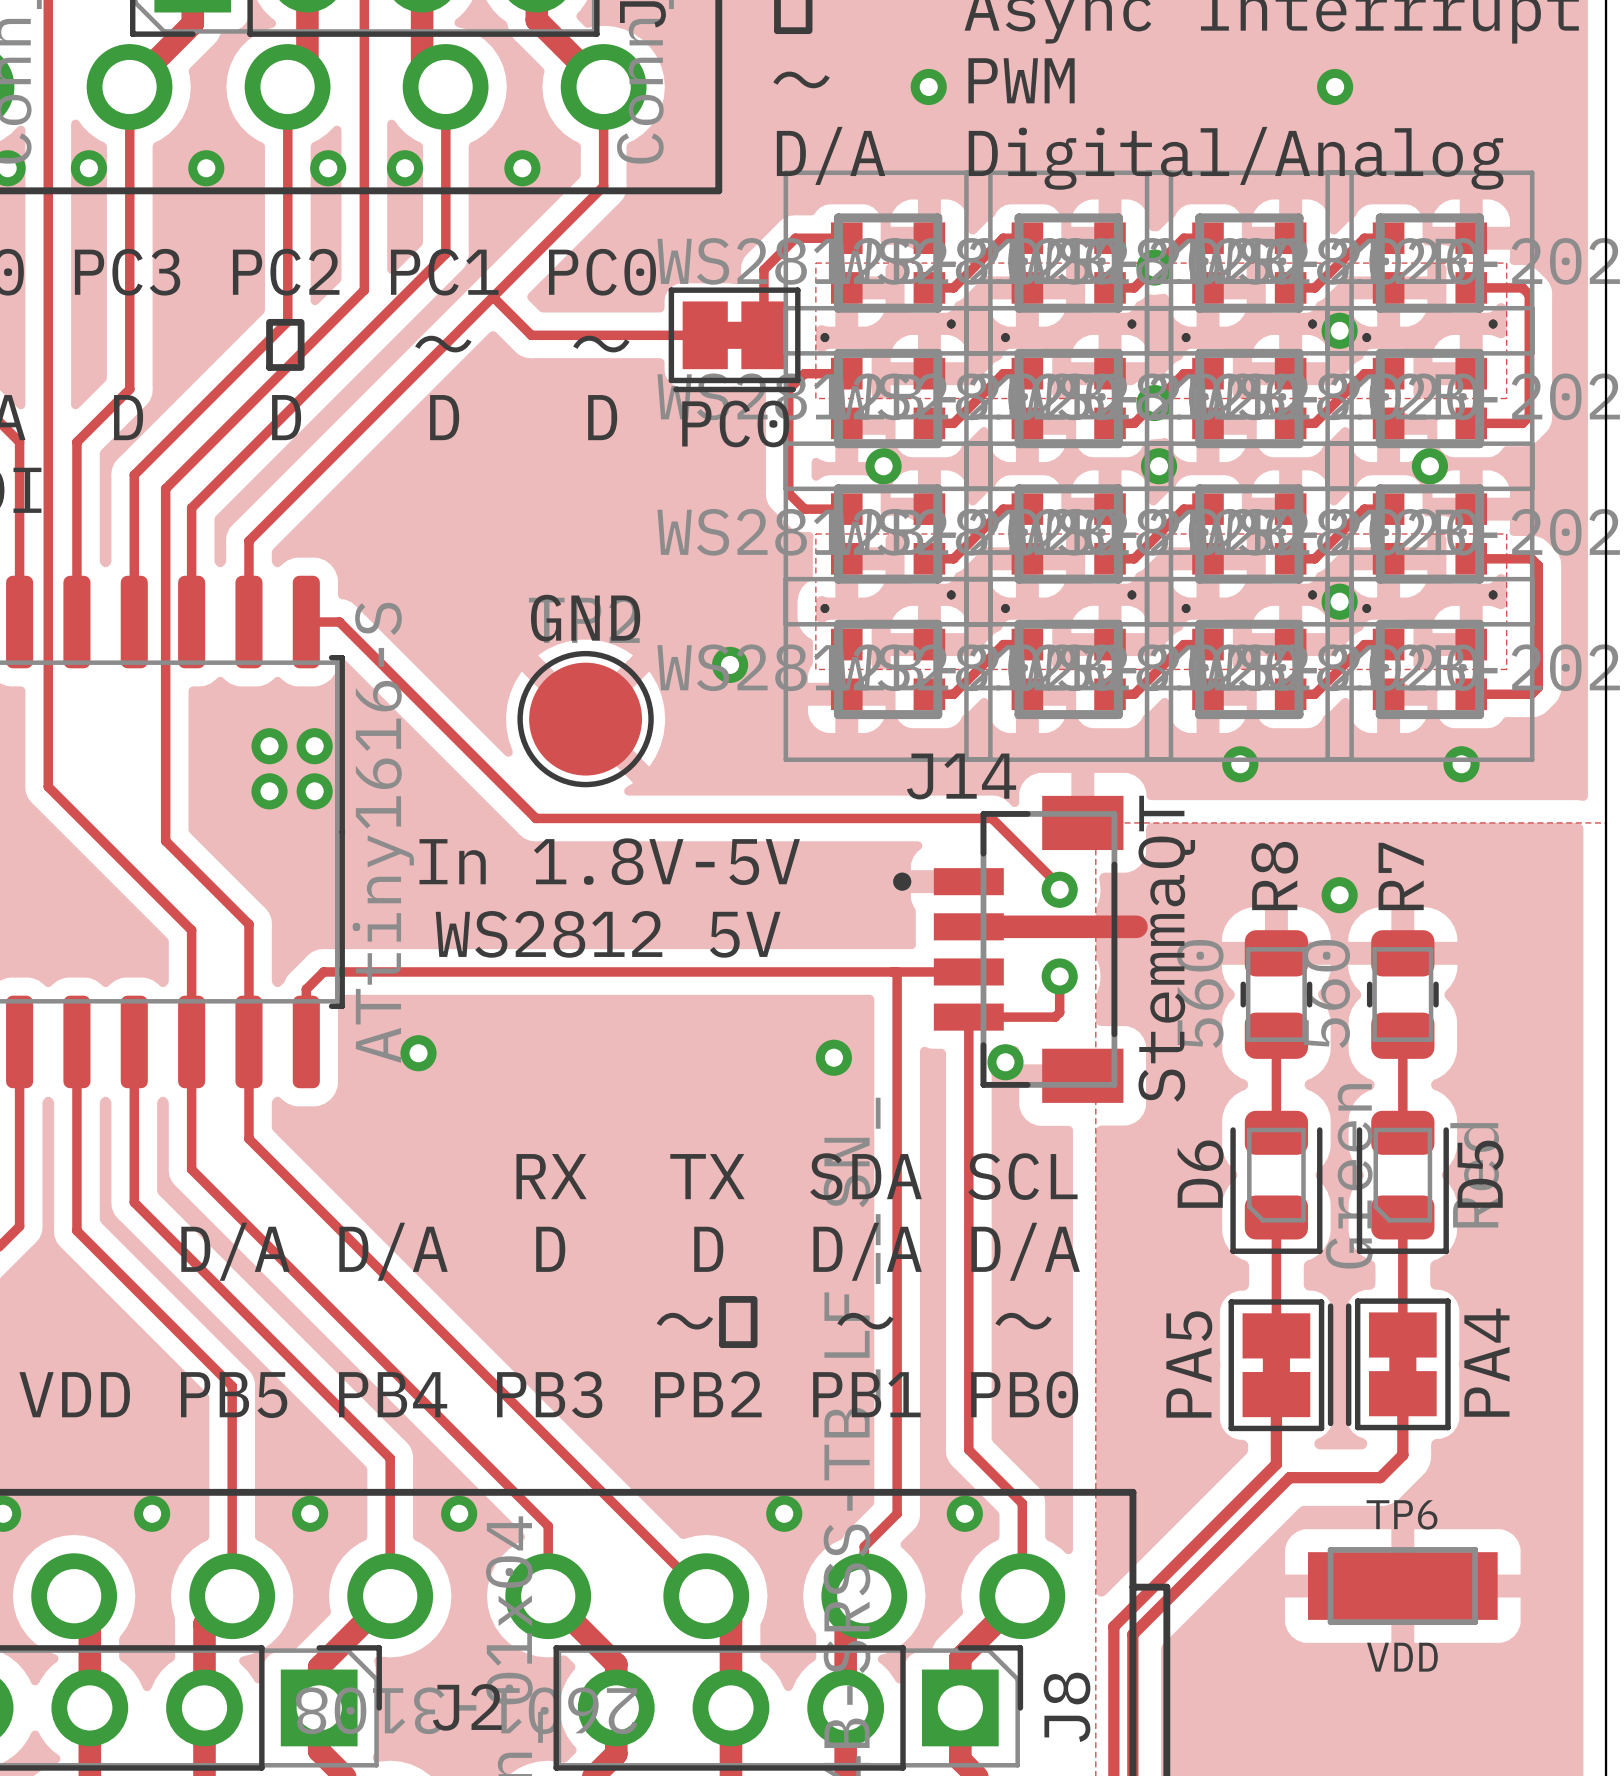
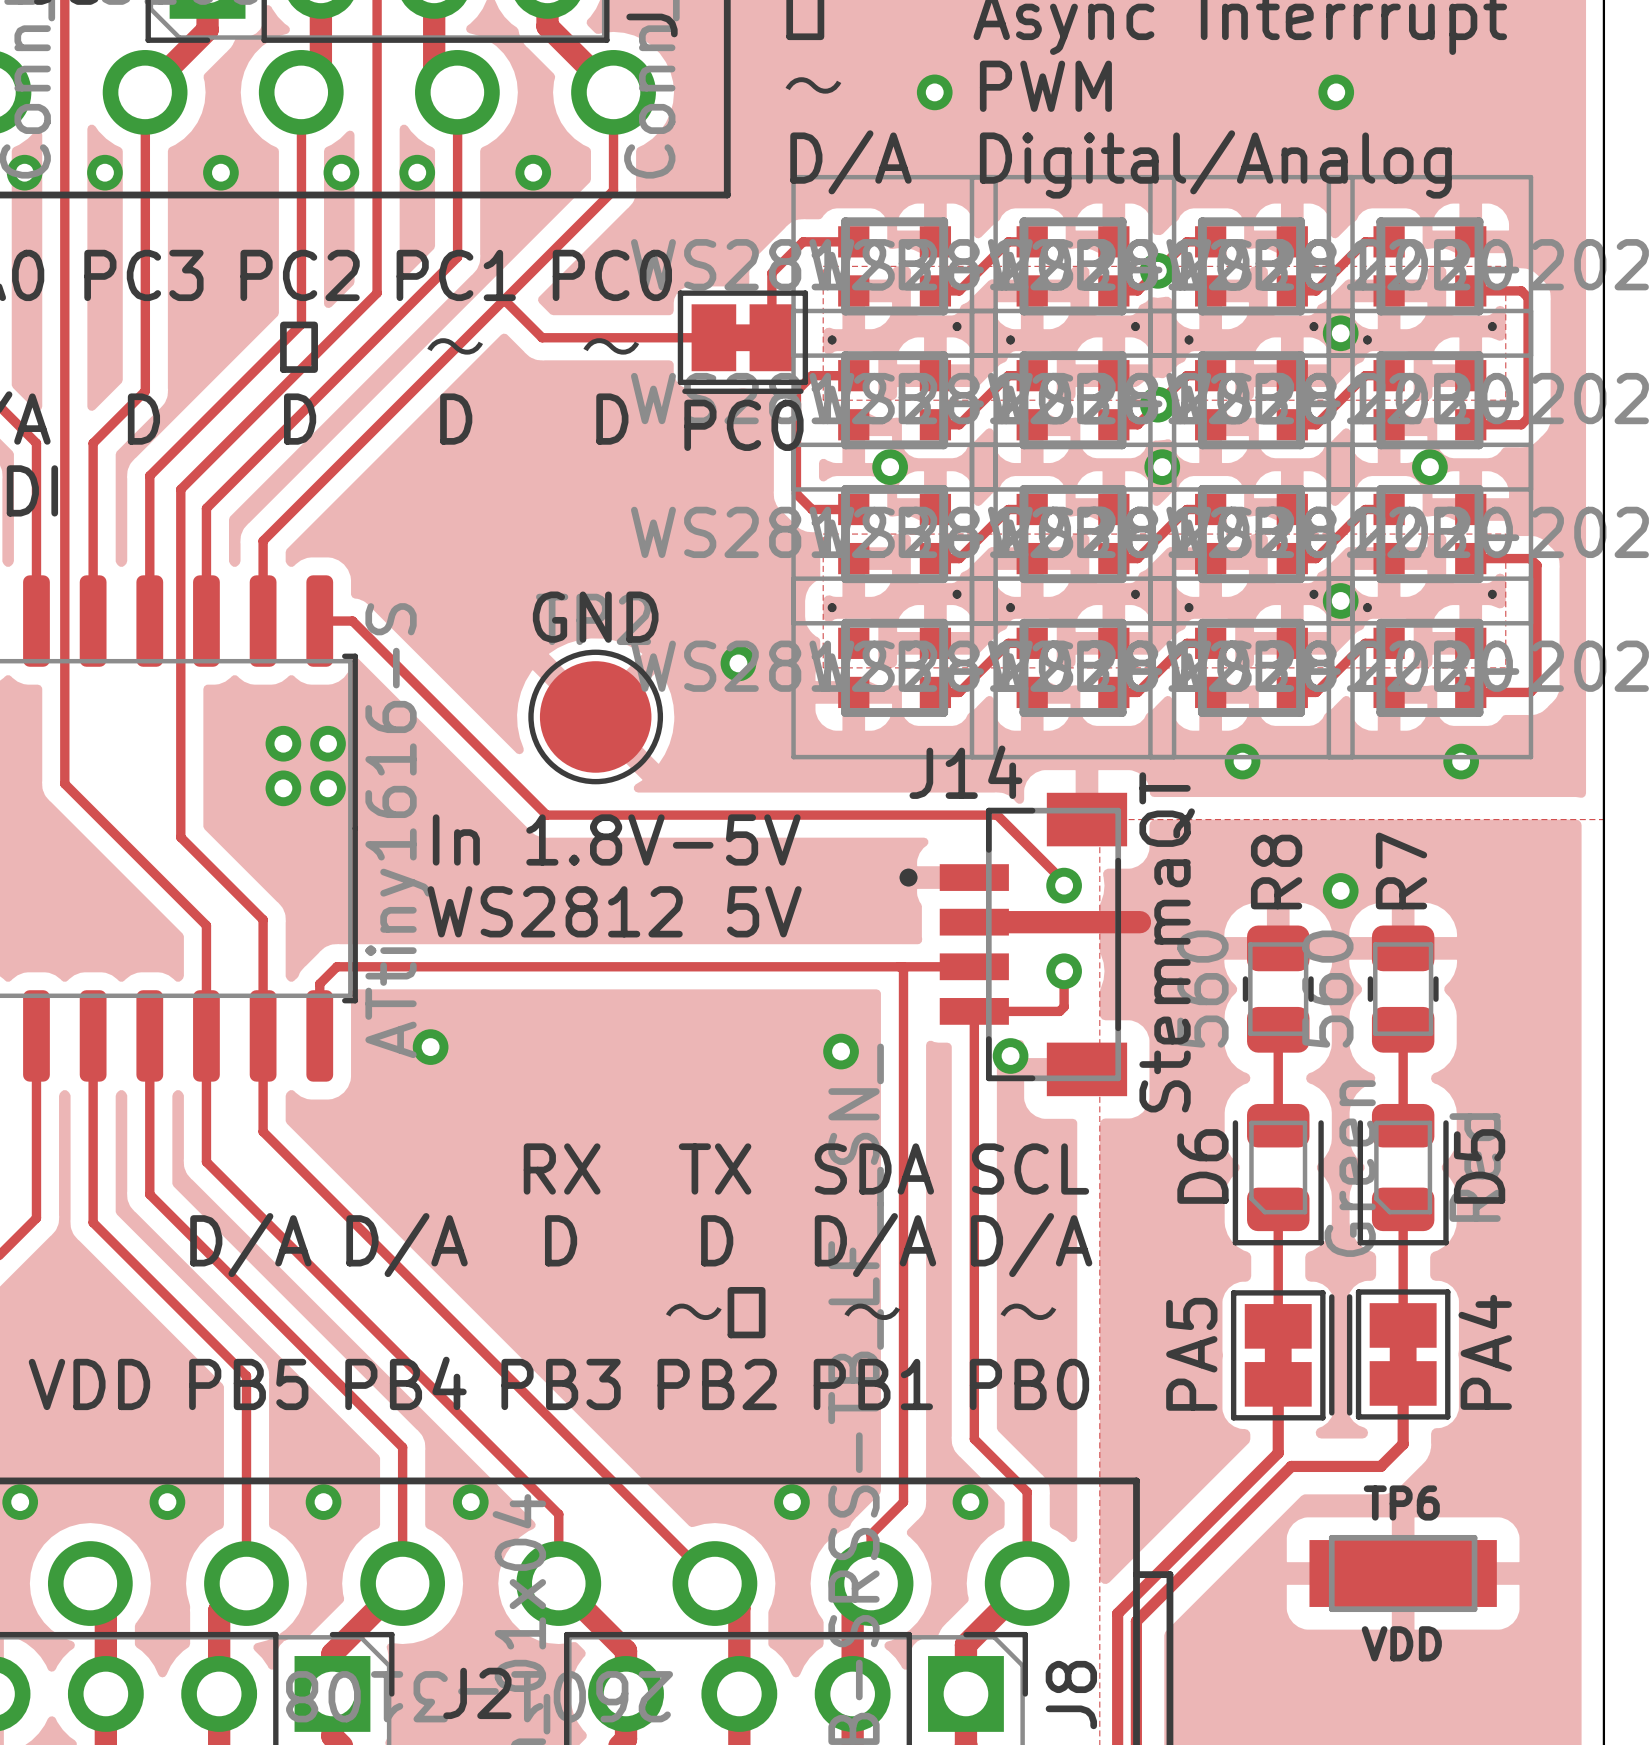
text position: In 1.8V-5V (609, 861) -> In 1.8V-5V (616, 839)
text position: WS2812 5V (608, 934) -> WS2812 5V (614, 911)

